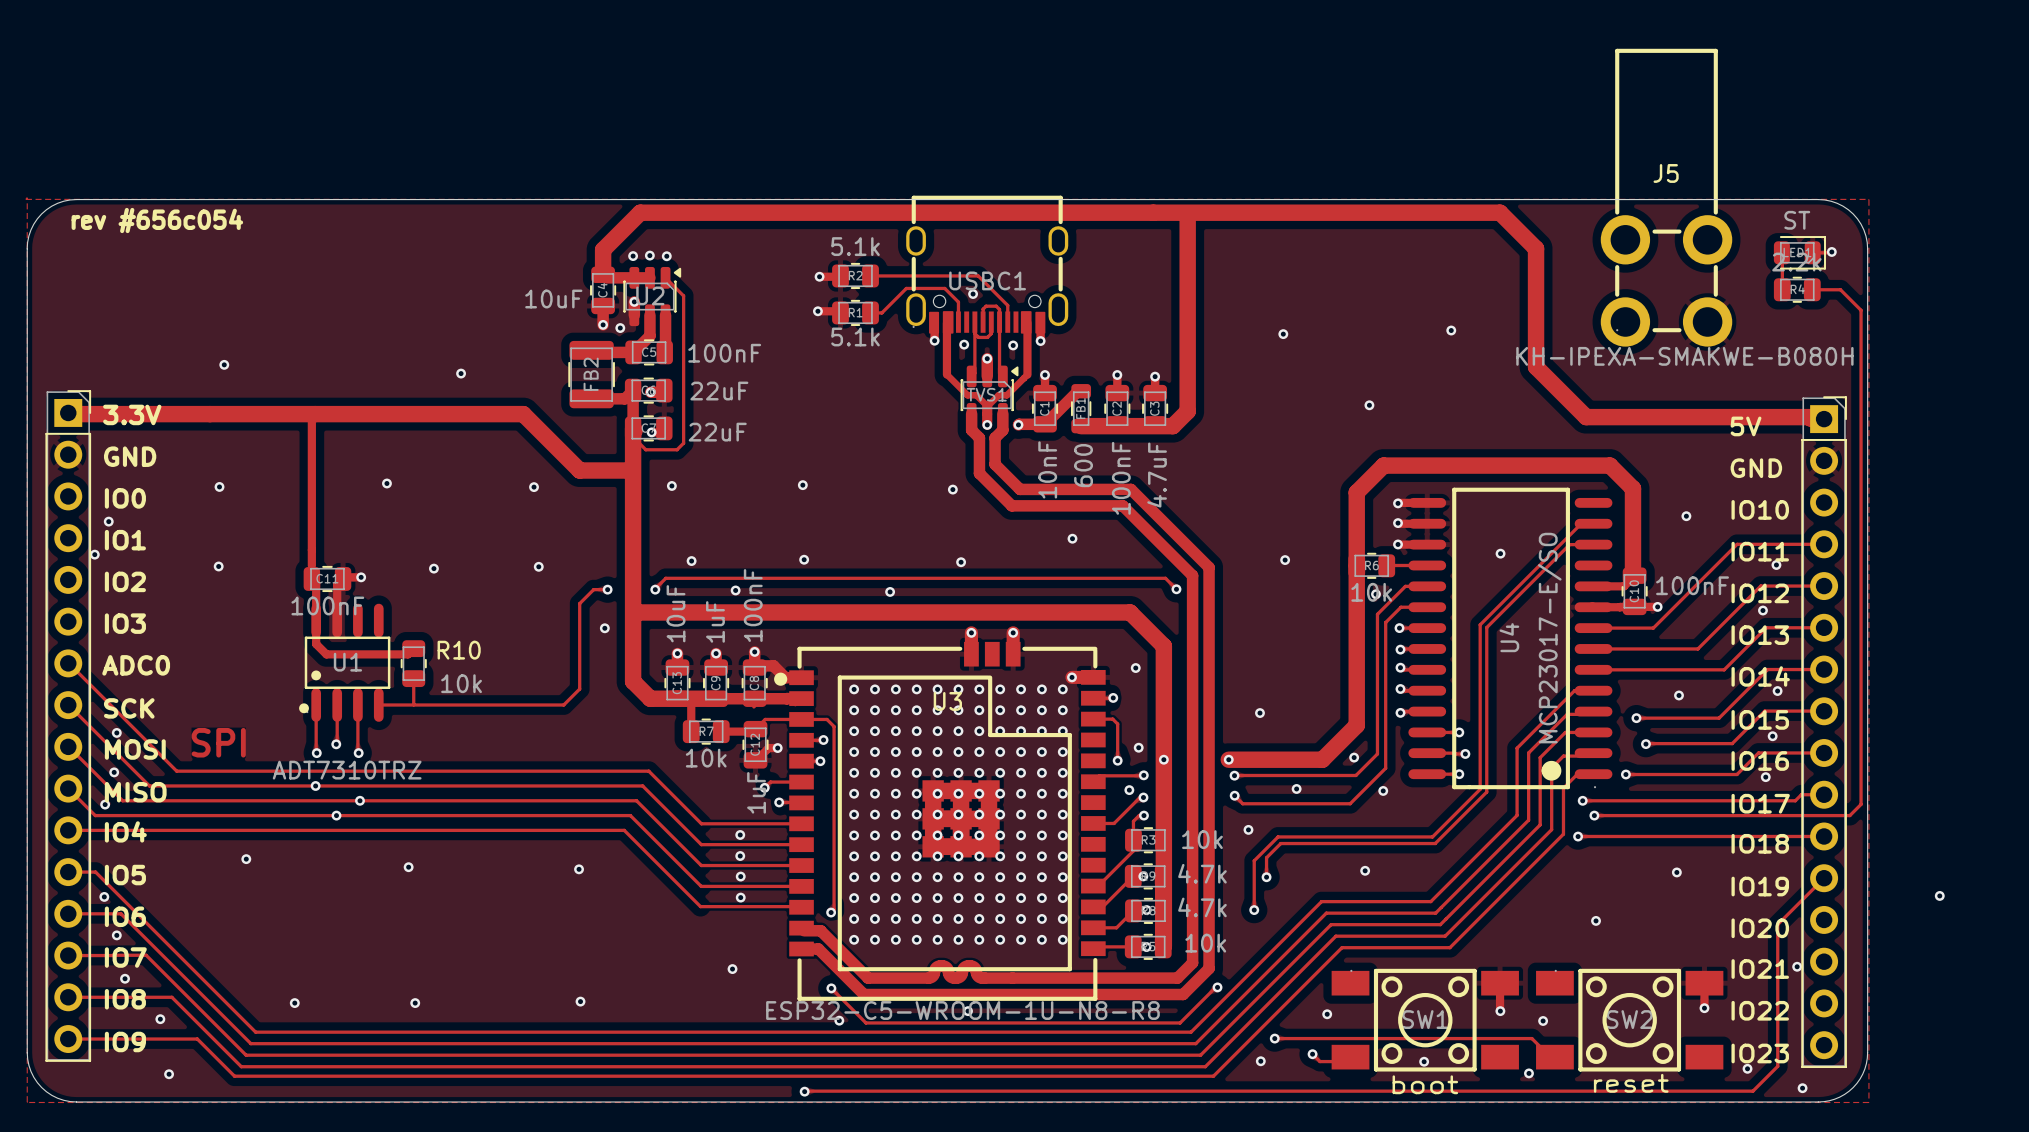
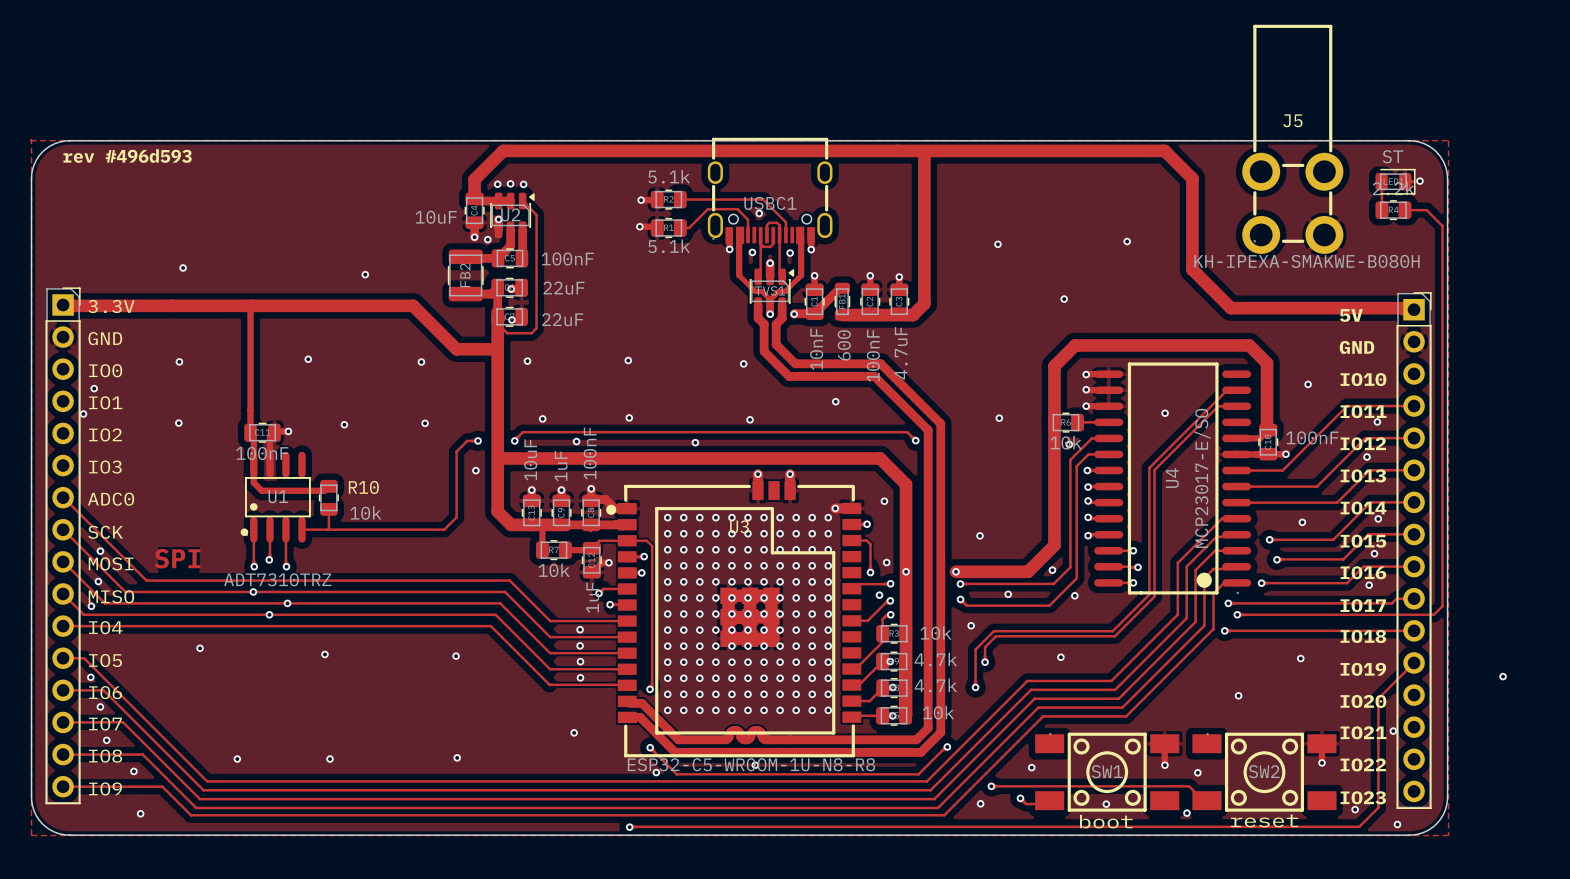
text: rev #656c054 (157, 220) -> rev #496d593 (127, 156)

